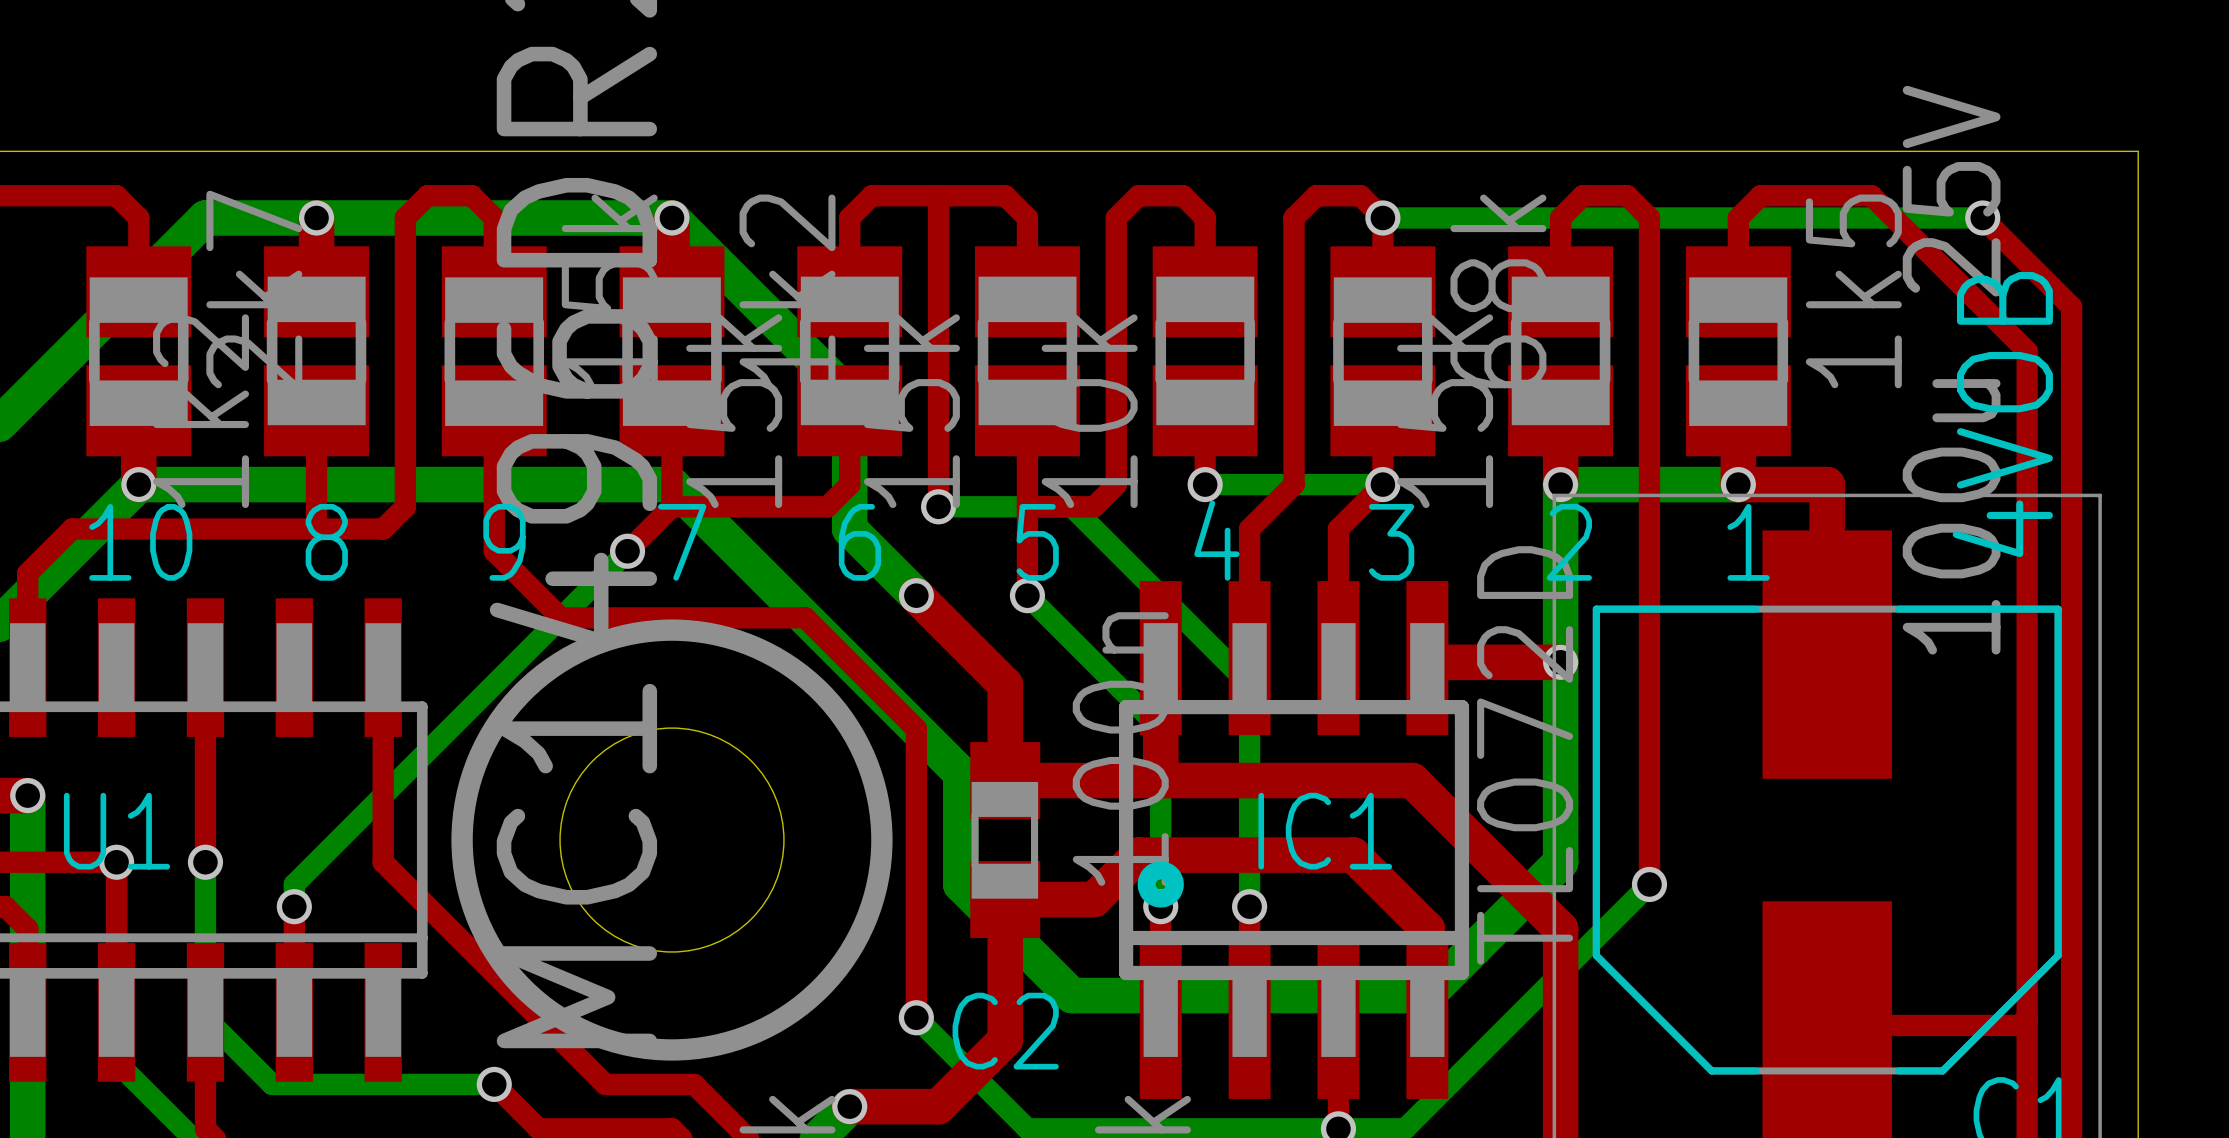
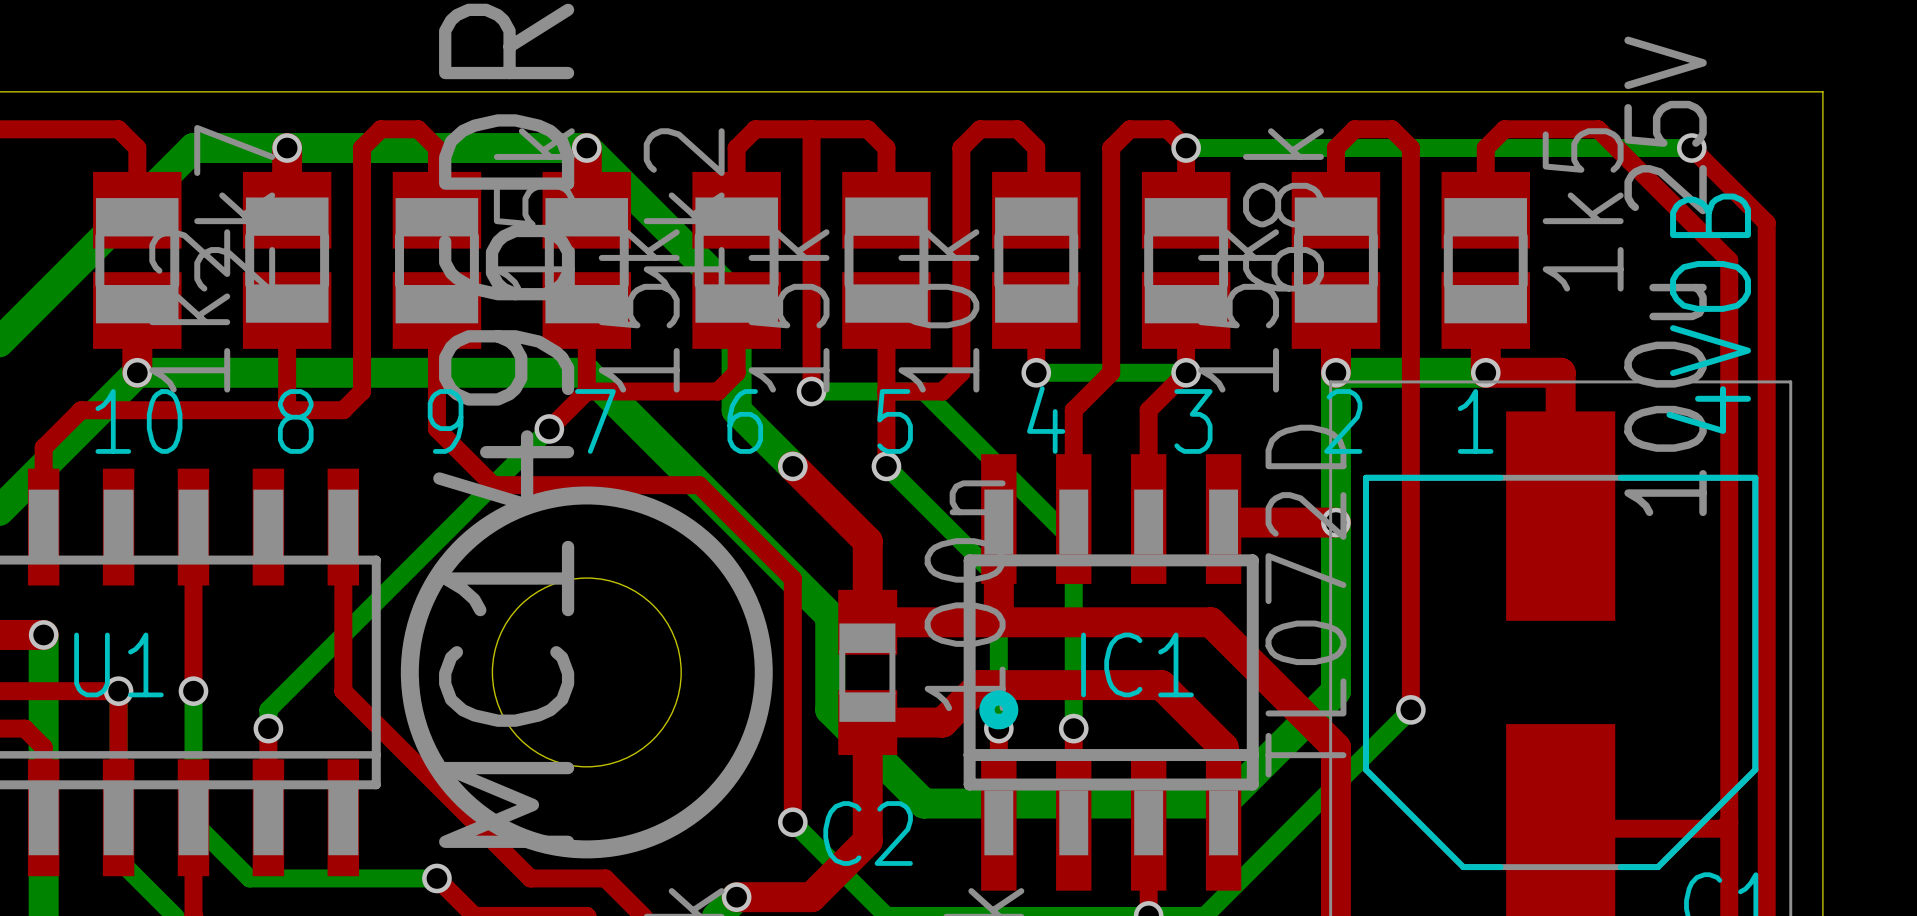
text position: 1 (1748, 542) -> 1 (1475, 421)

